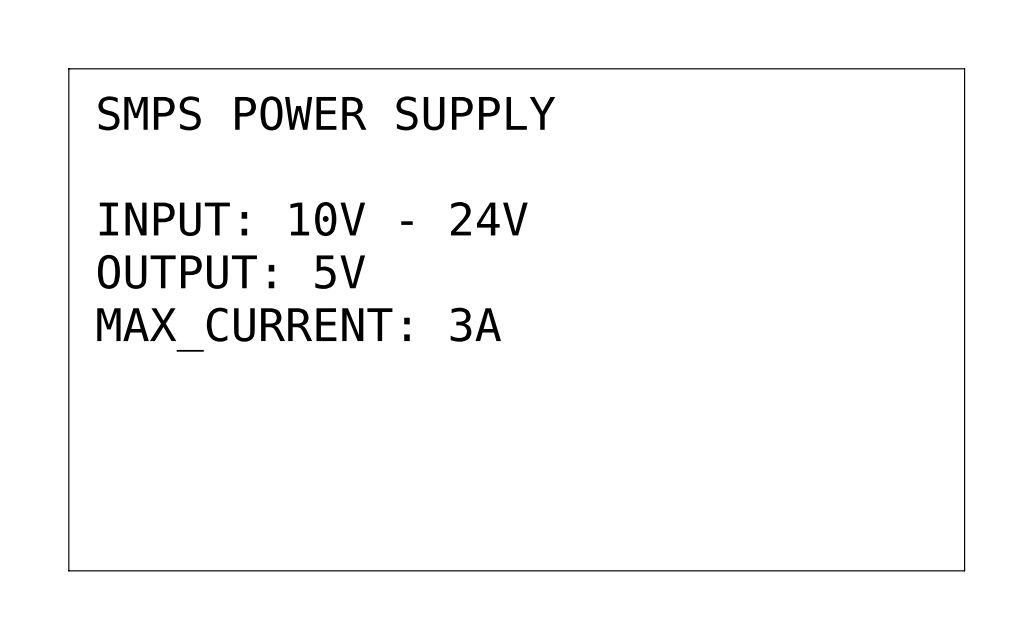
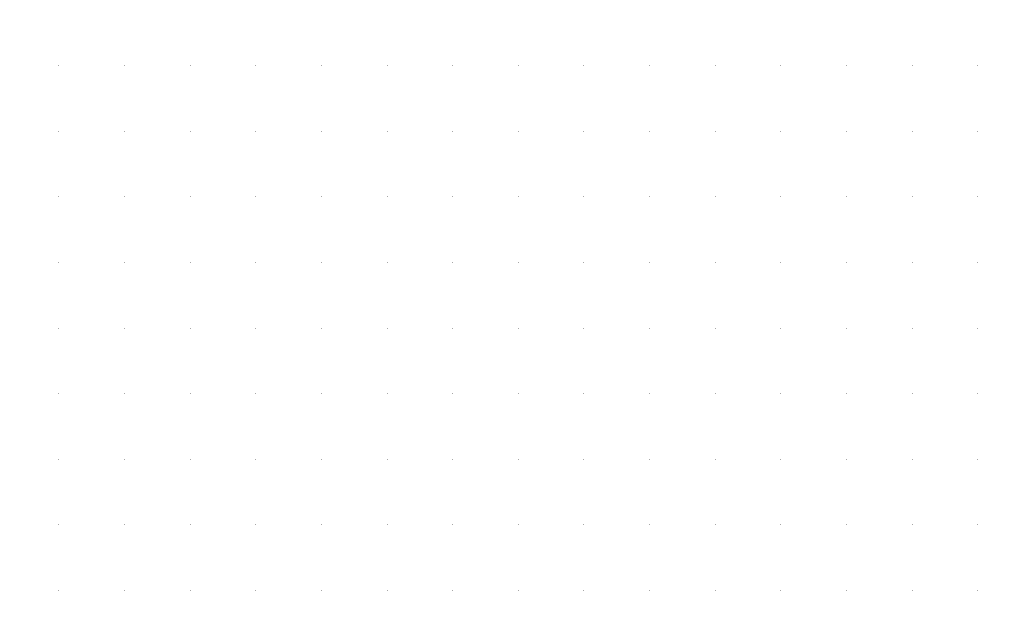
line: (68, 68) (964, 68) (964, 570) (68, 570) (68, 68) -> none
text: SMPS POWER SUPPLY (326, 113) -> none
text: INPUT: 10V - 24V (313, 219) -> none
text: OUTPUT: 5V (231, 271) -> none
text: MAX_CURRENT: 3A (299, 329) -> none

